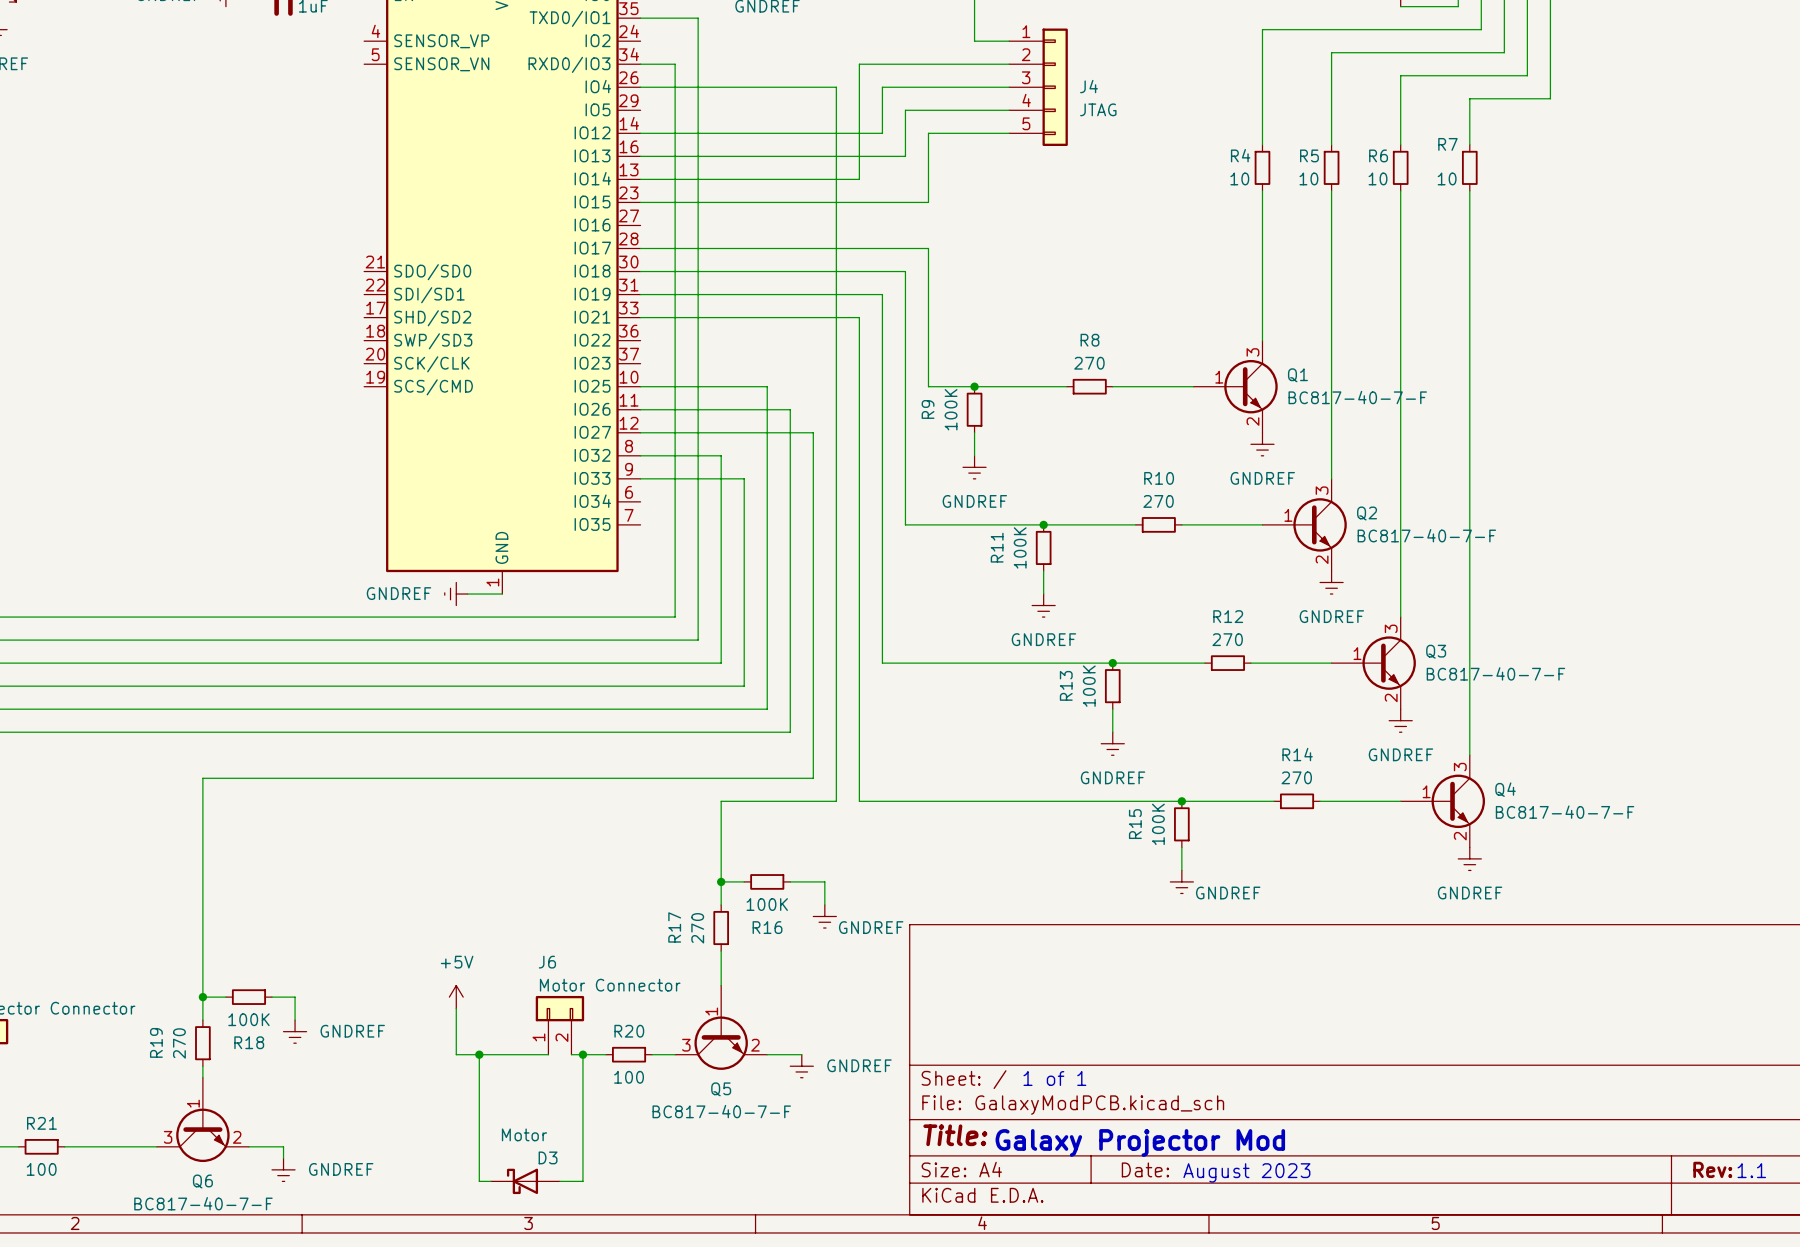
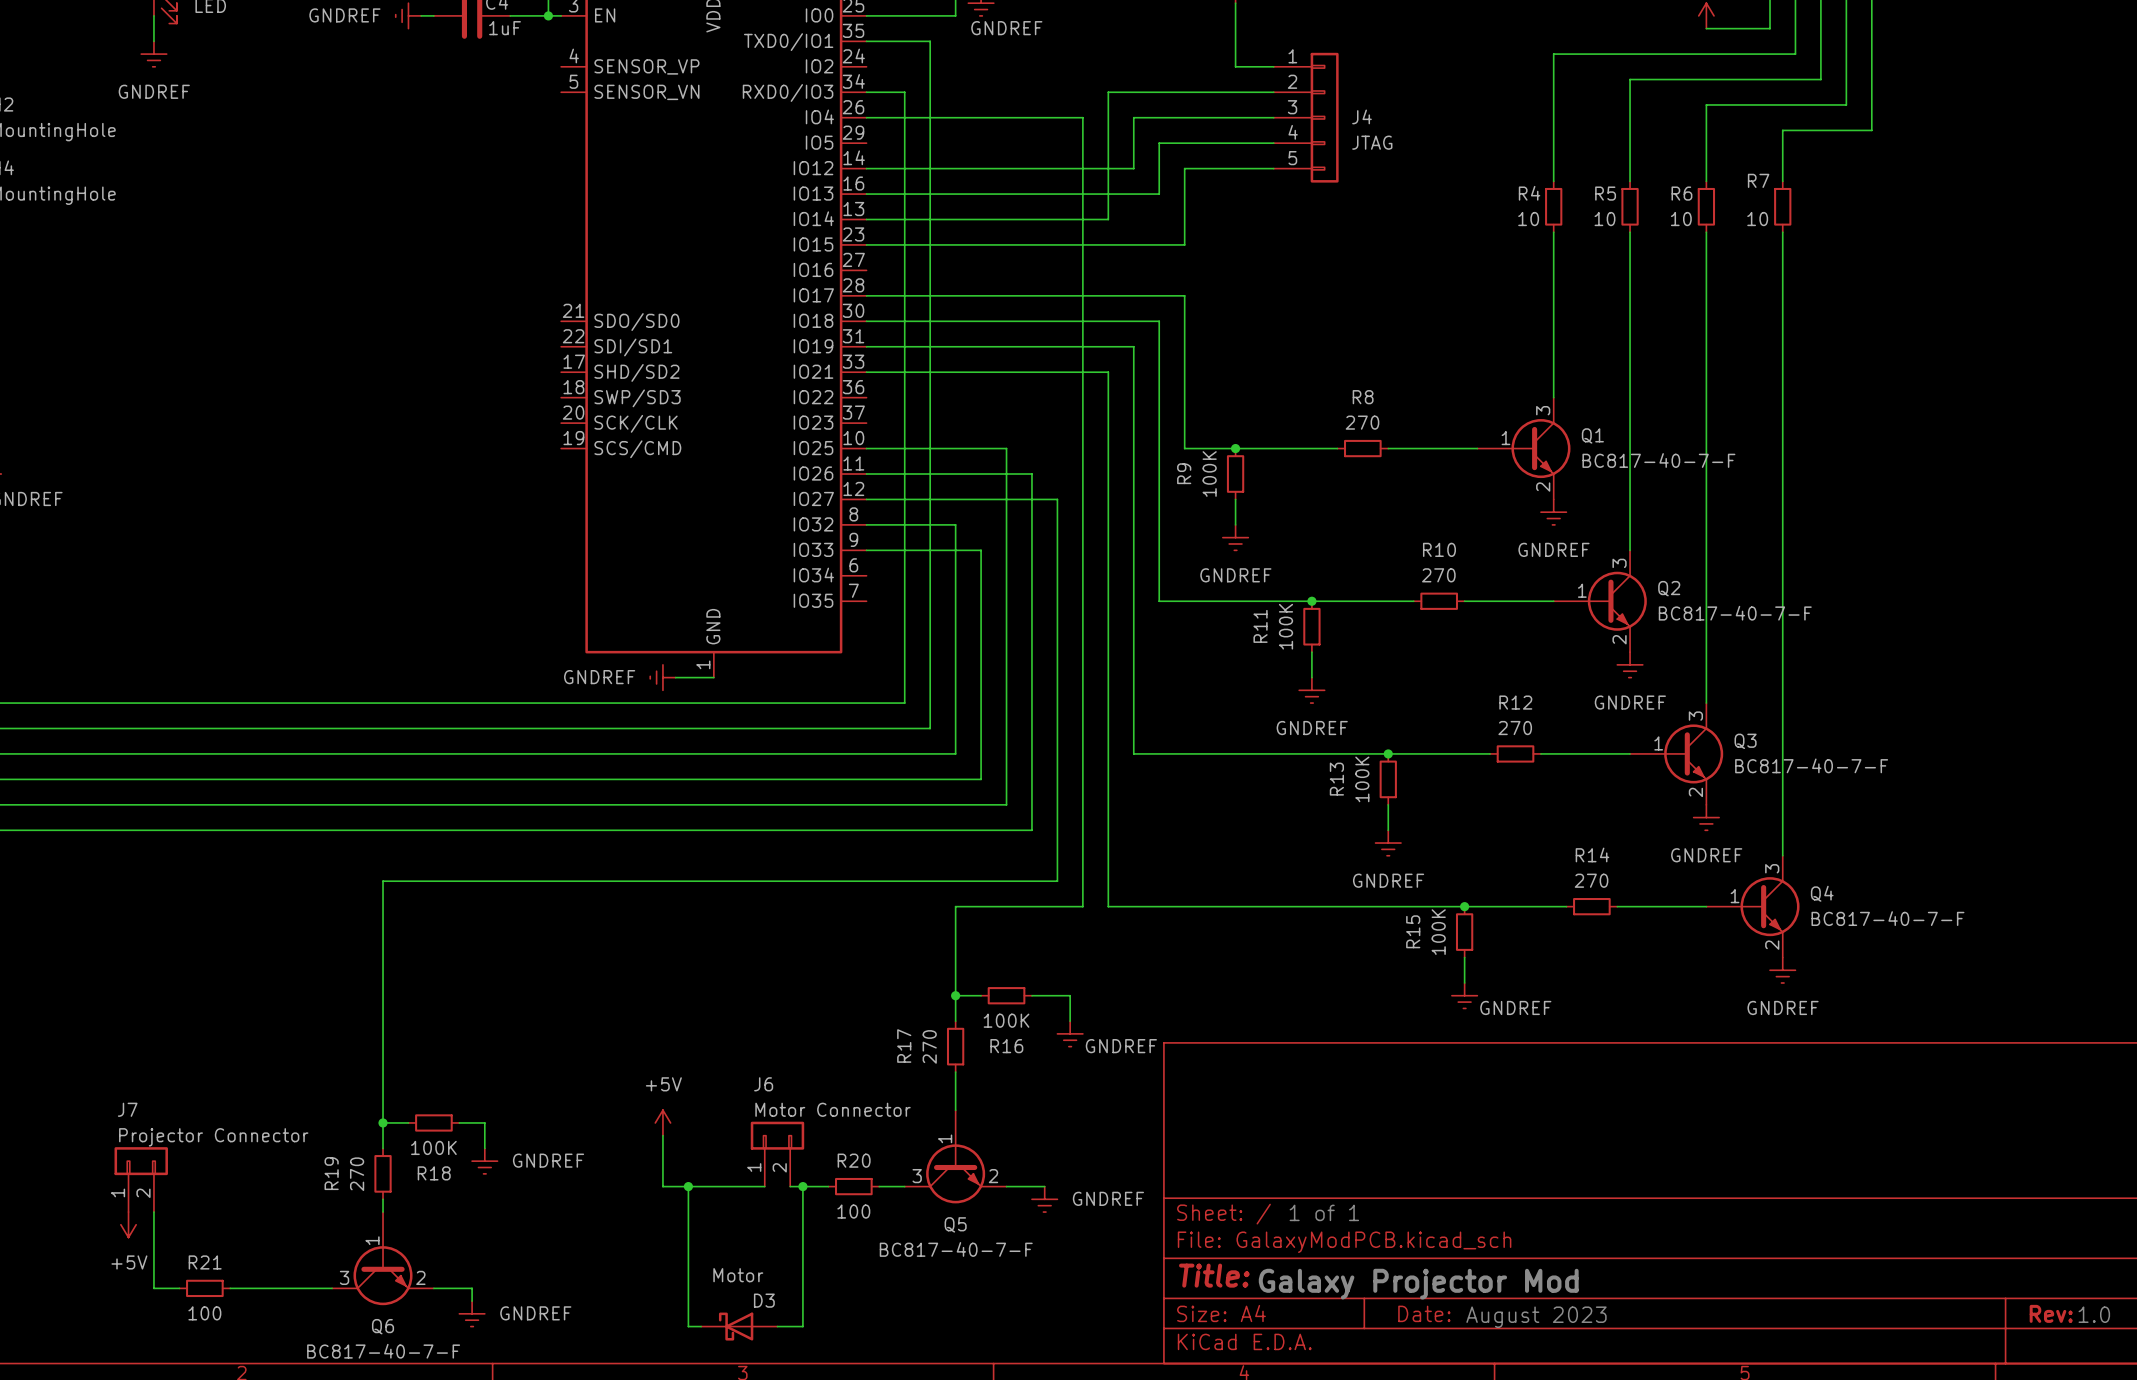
text: 1.1 (1751, 1170) -> 1.0 (2094, 1314)

